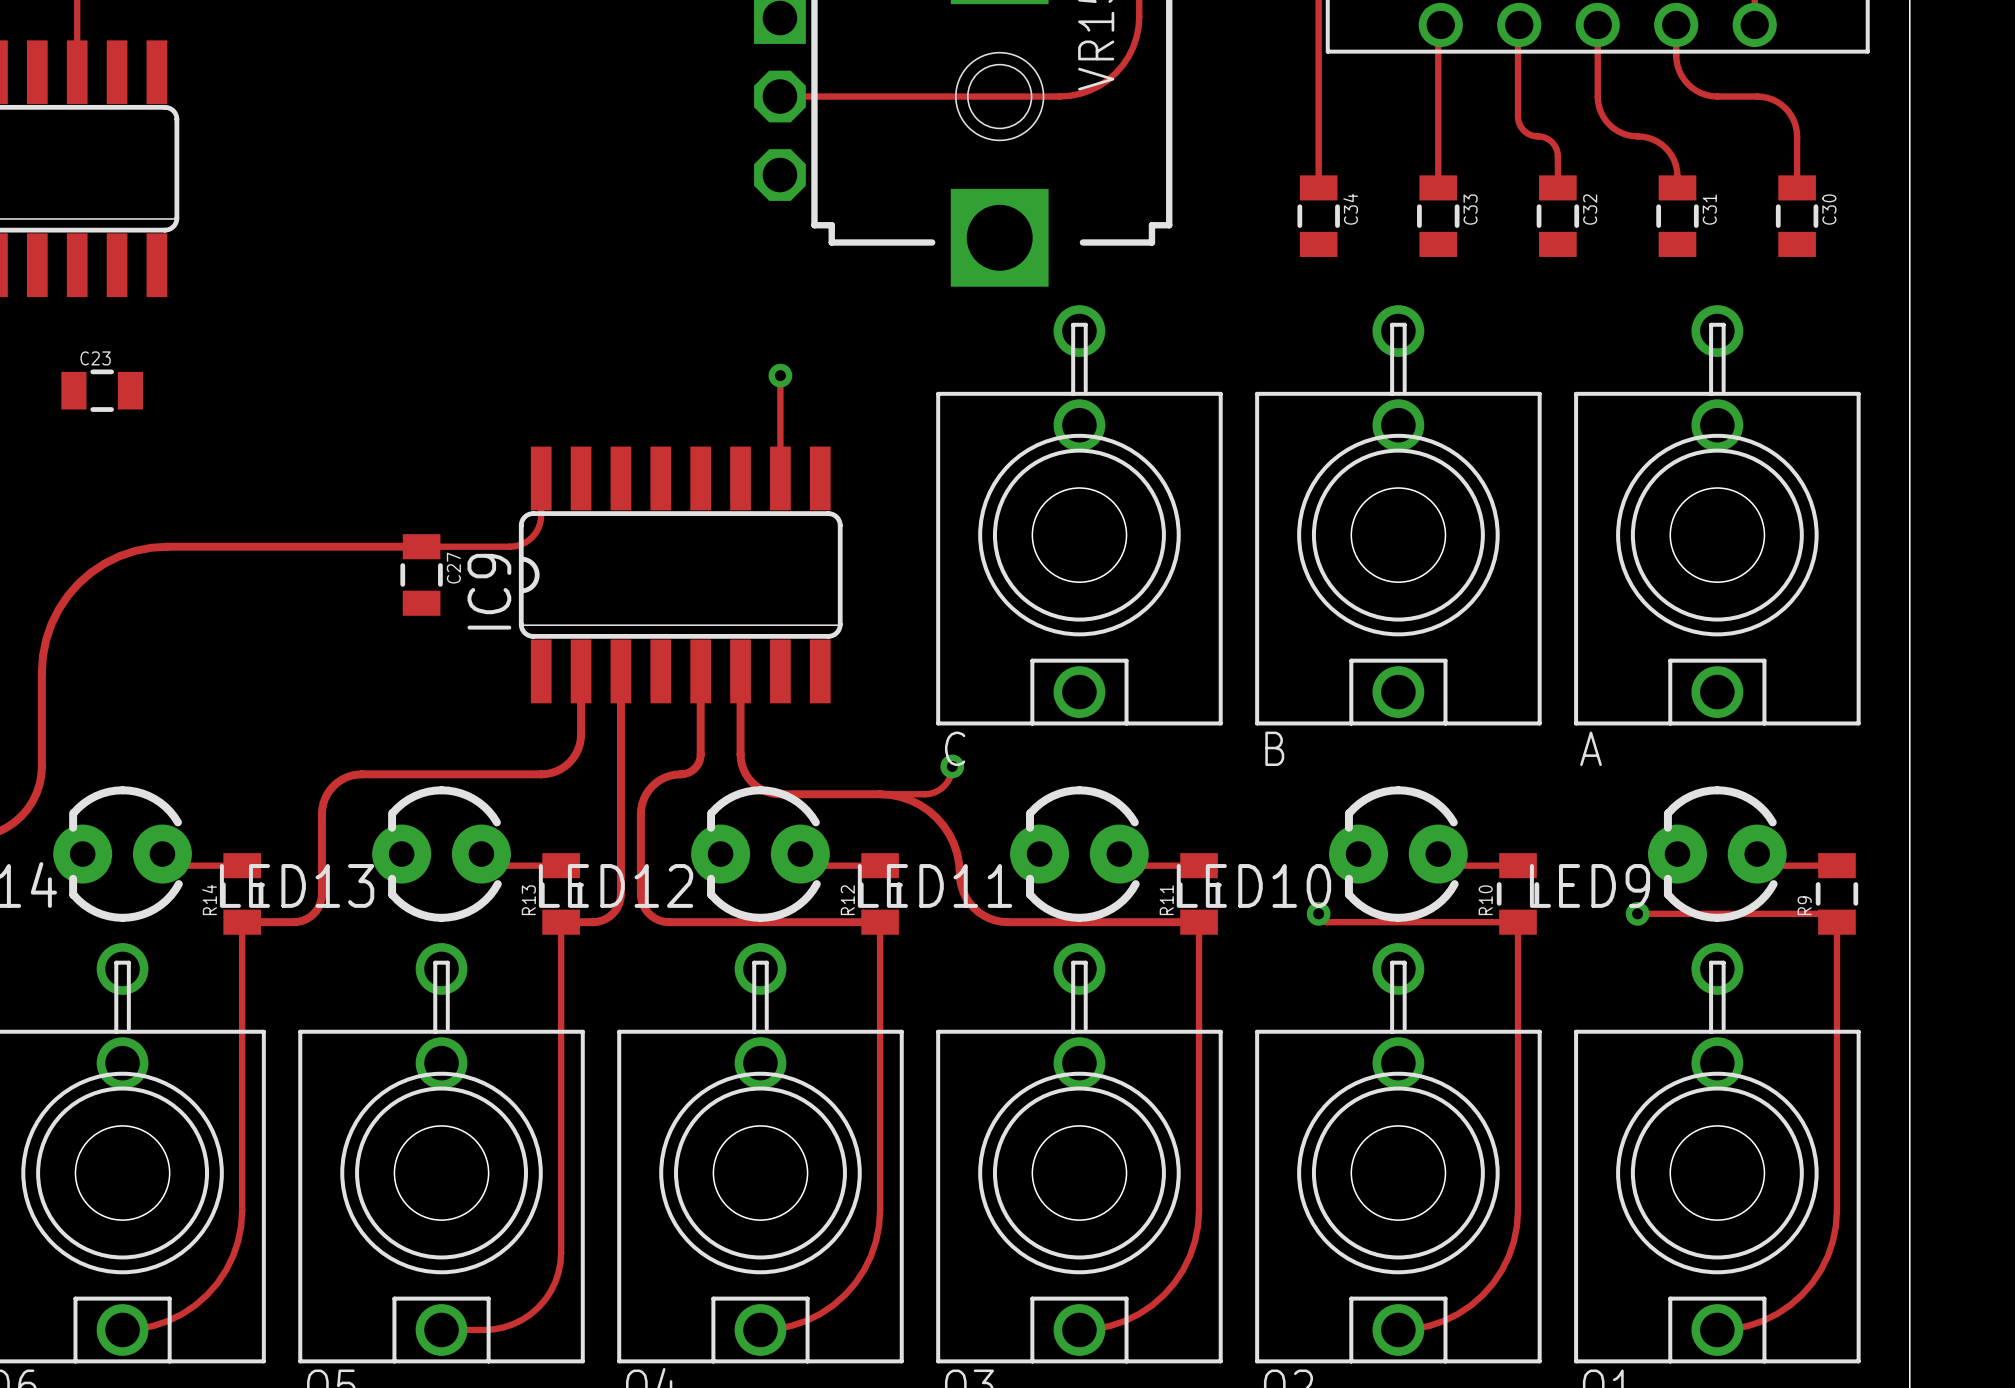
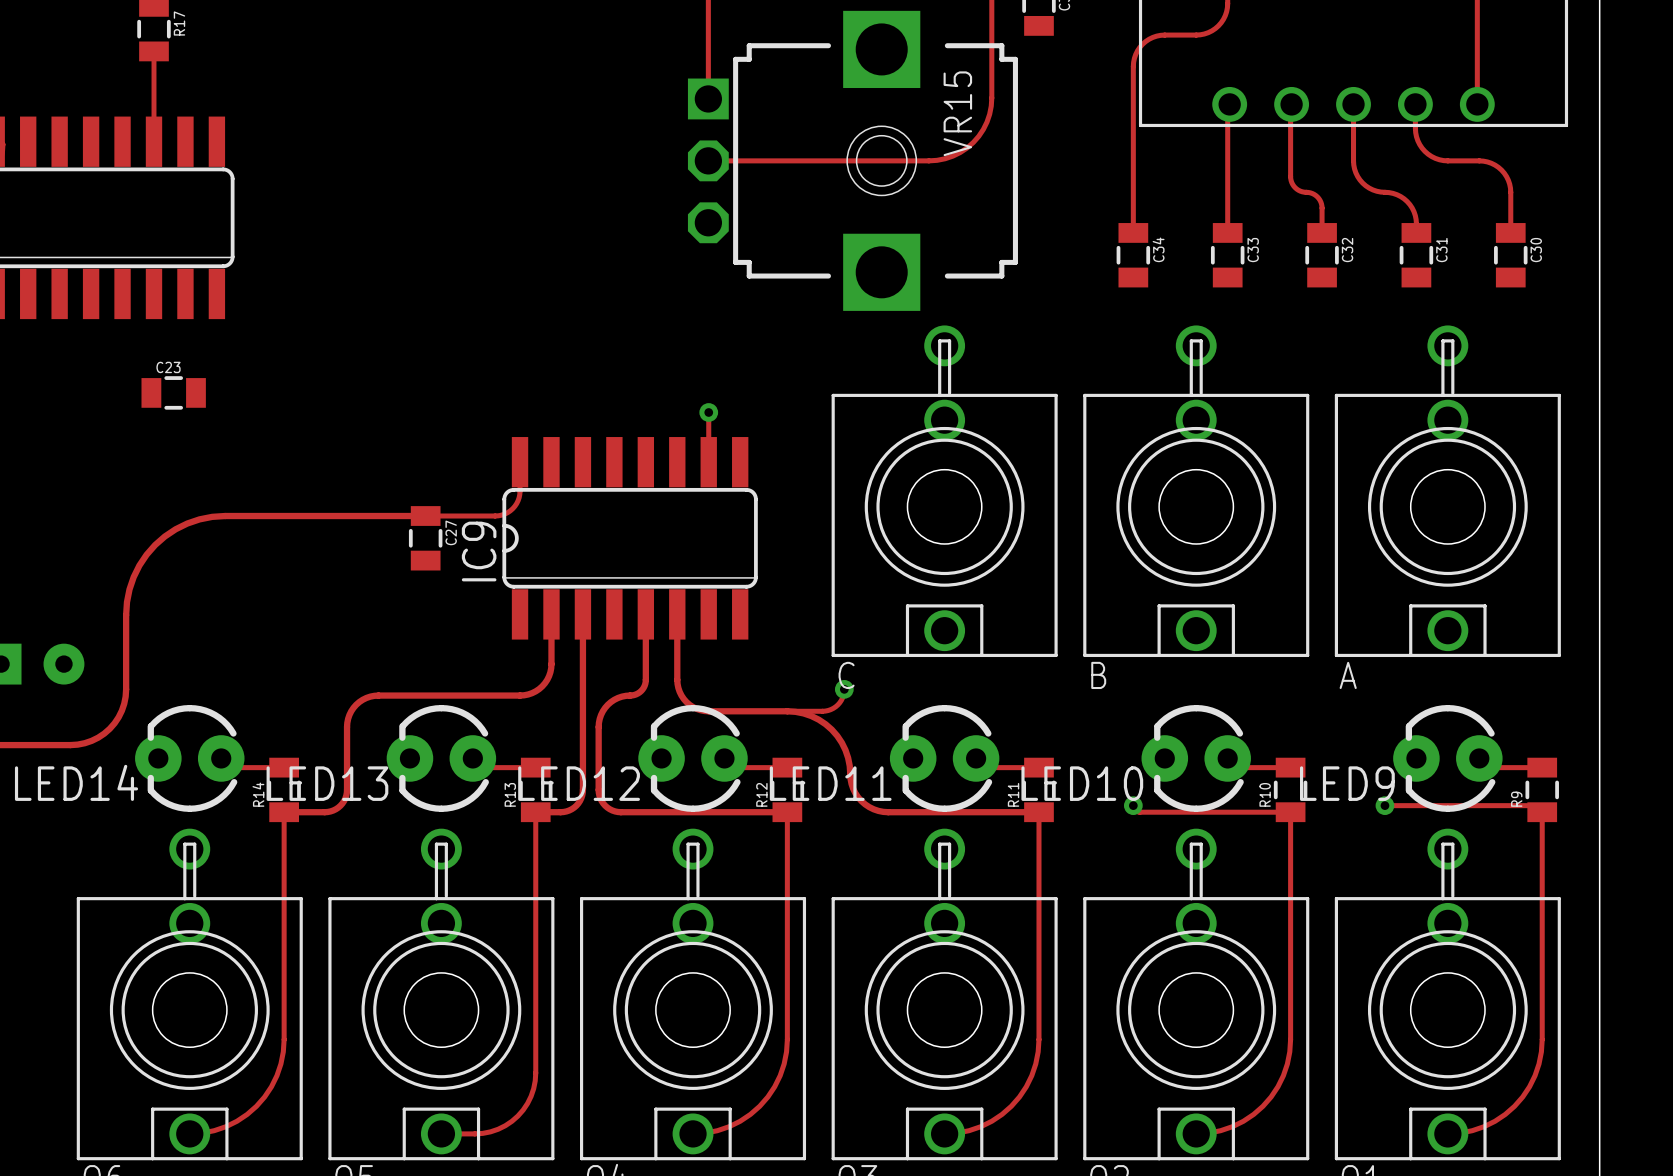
track: (780, 375) (780, 415) -> none
via position: (780, 375) -> (708, 412)

